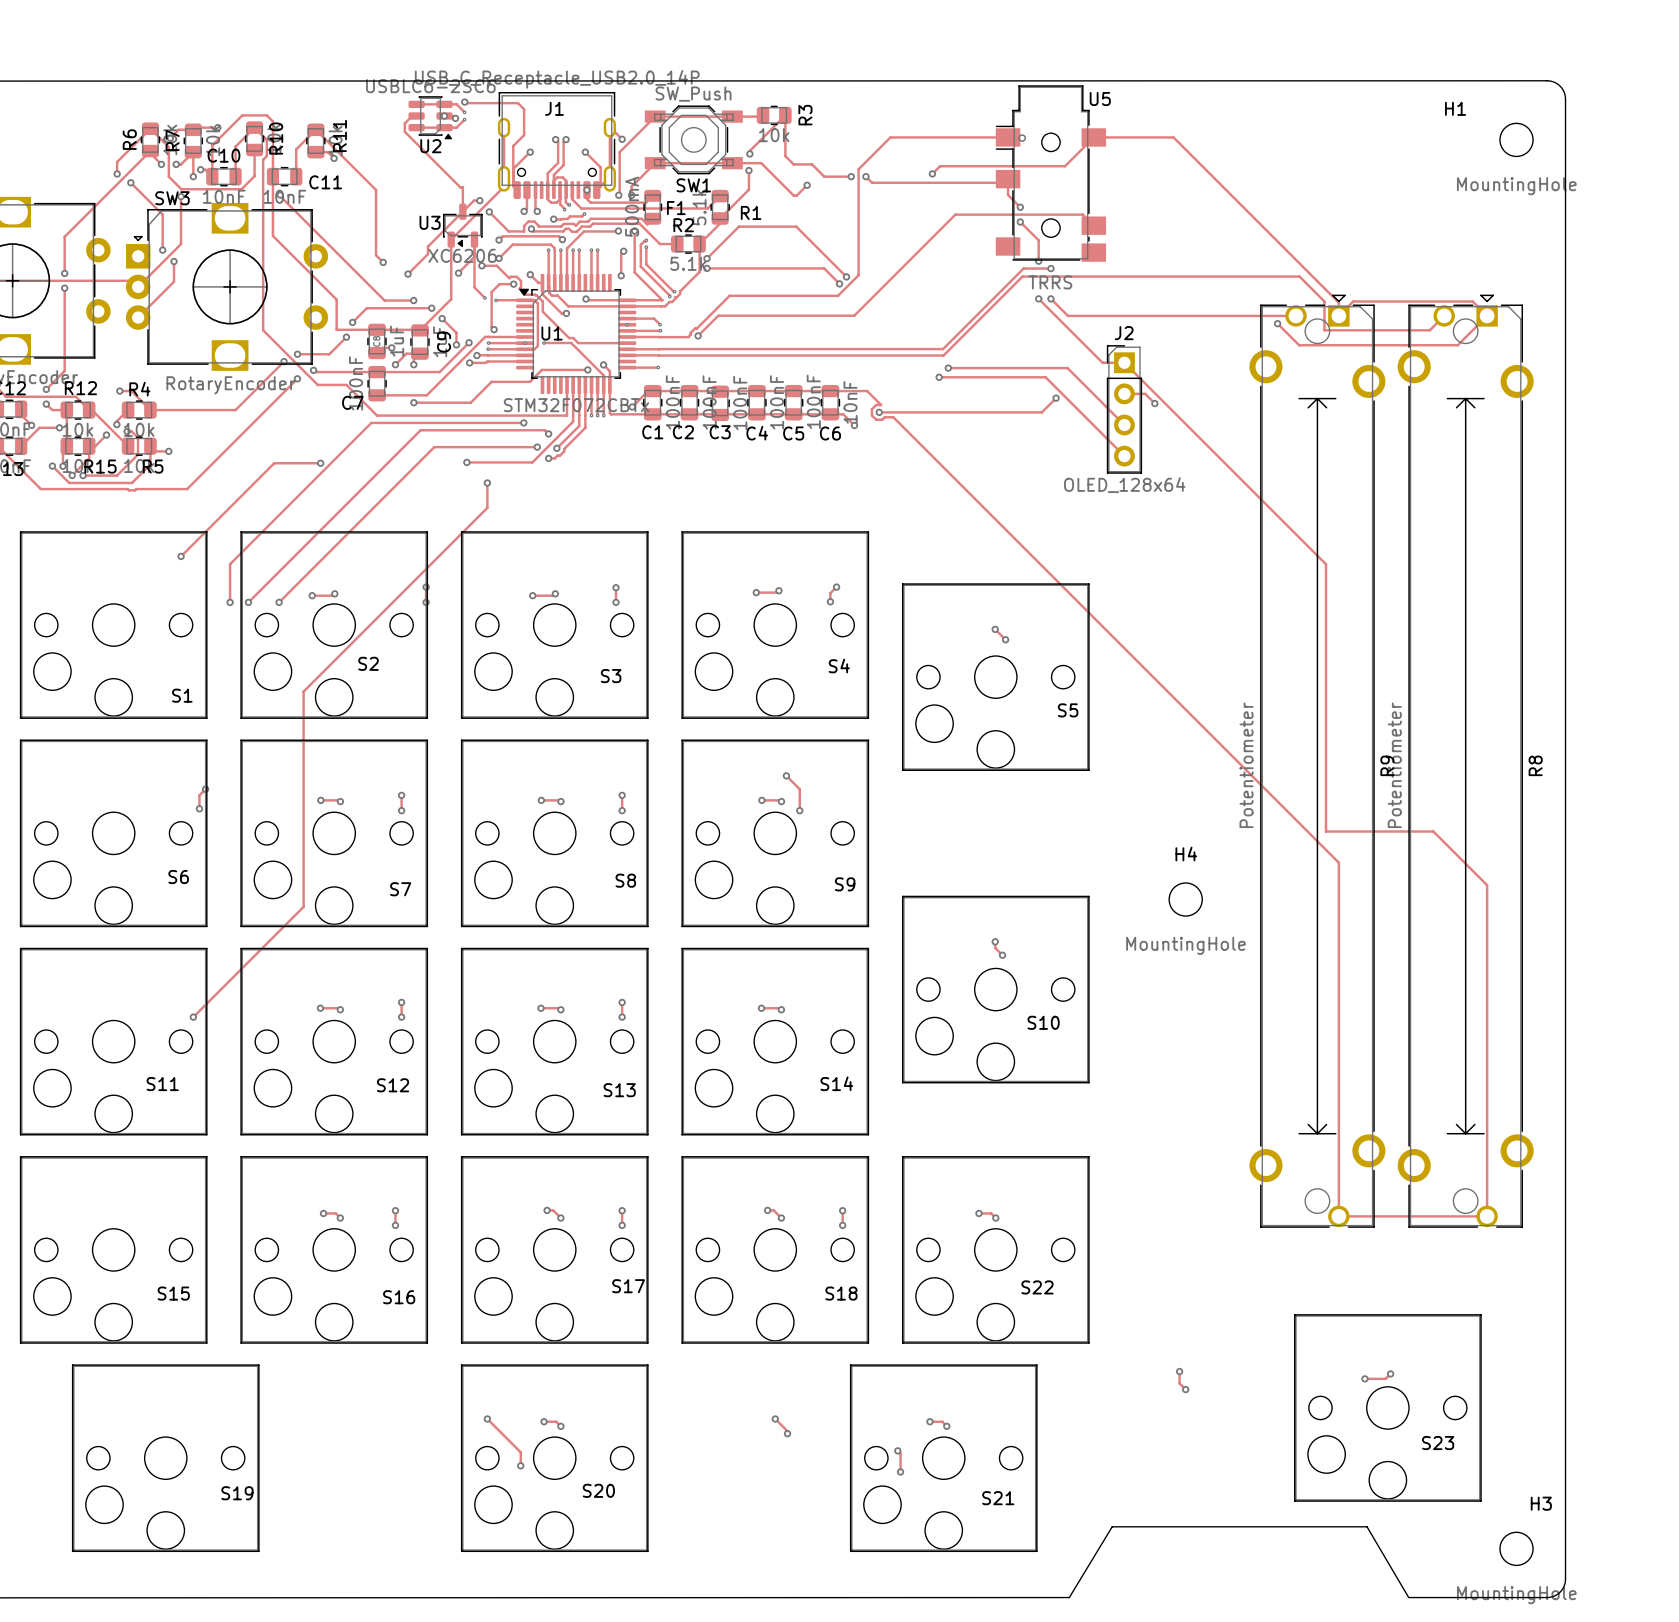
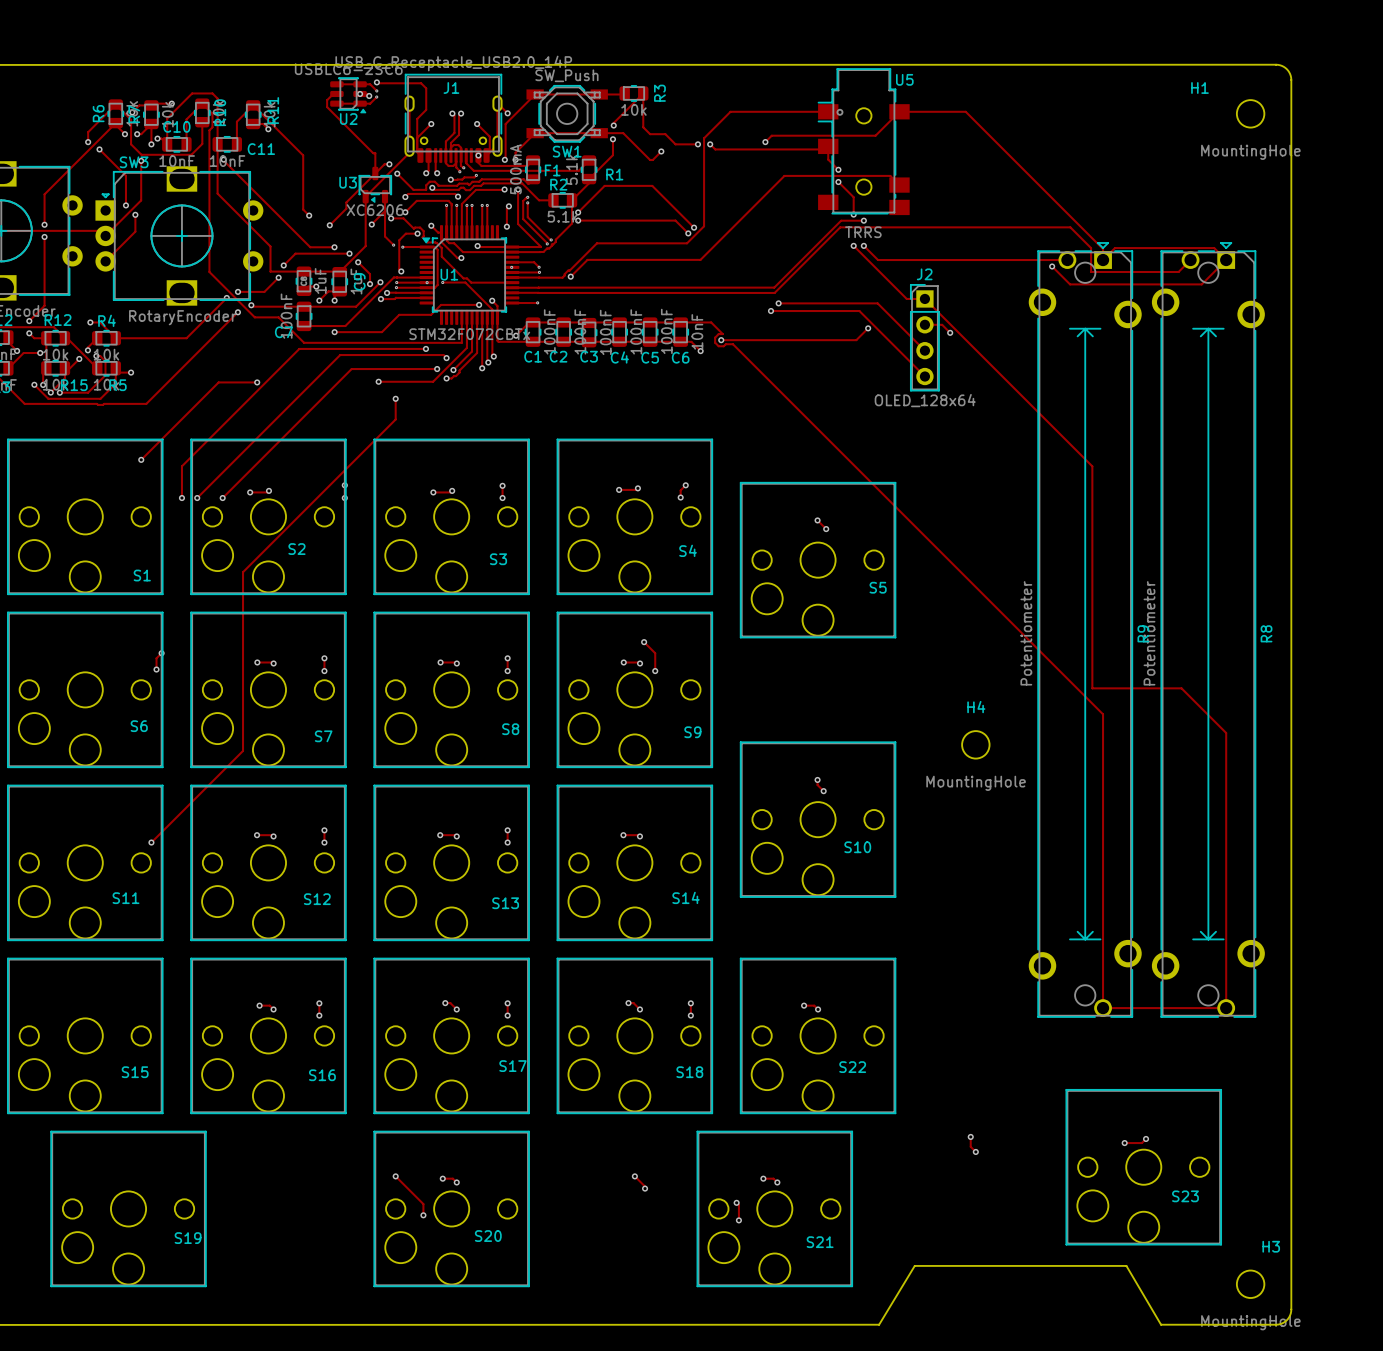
track: none -> (482, 342) (482, 368)
via: (591, 415) -> none
track: none -> (487, 342) (488, 362)
via: (597, 415) -> none
track: none -> (492, 342) (493, 356)
via: (603, 415) -> none
via: none -> (493, 356)
via: none -> (488, 362)
via: none -> (482, 368)

